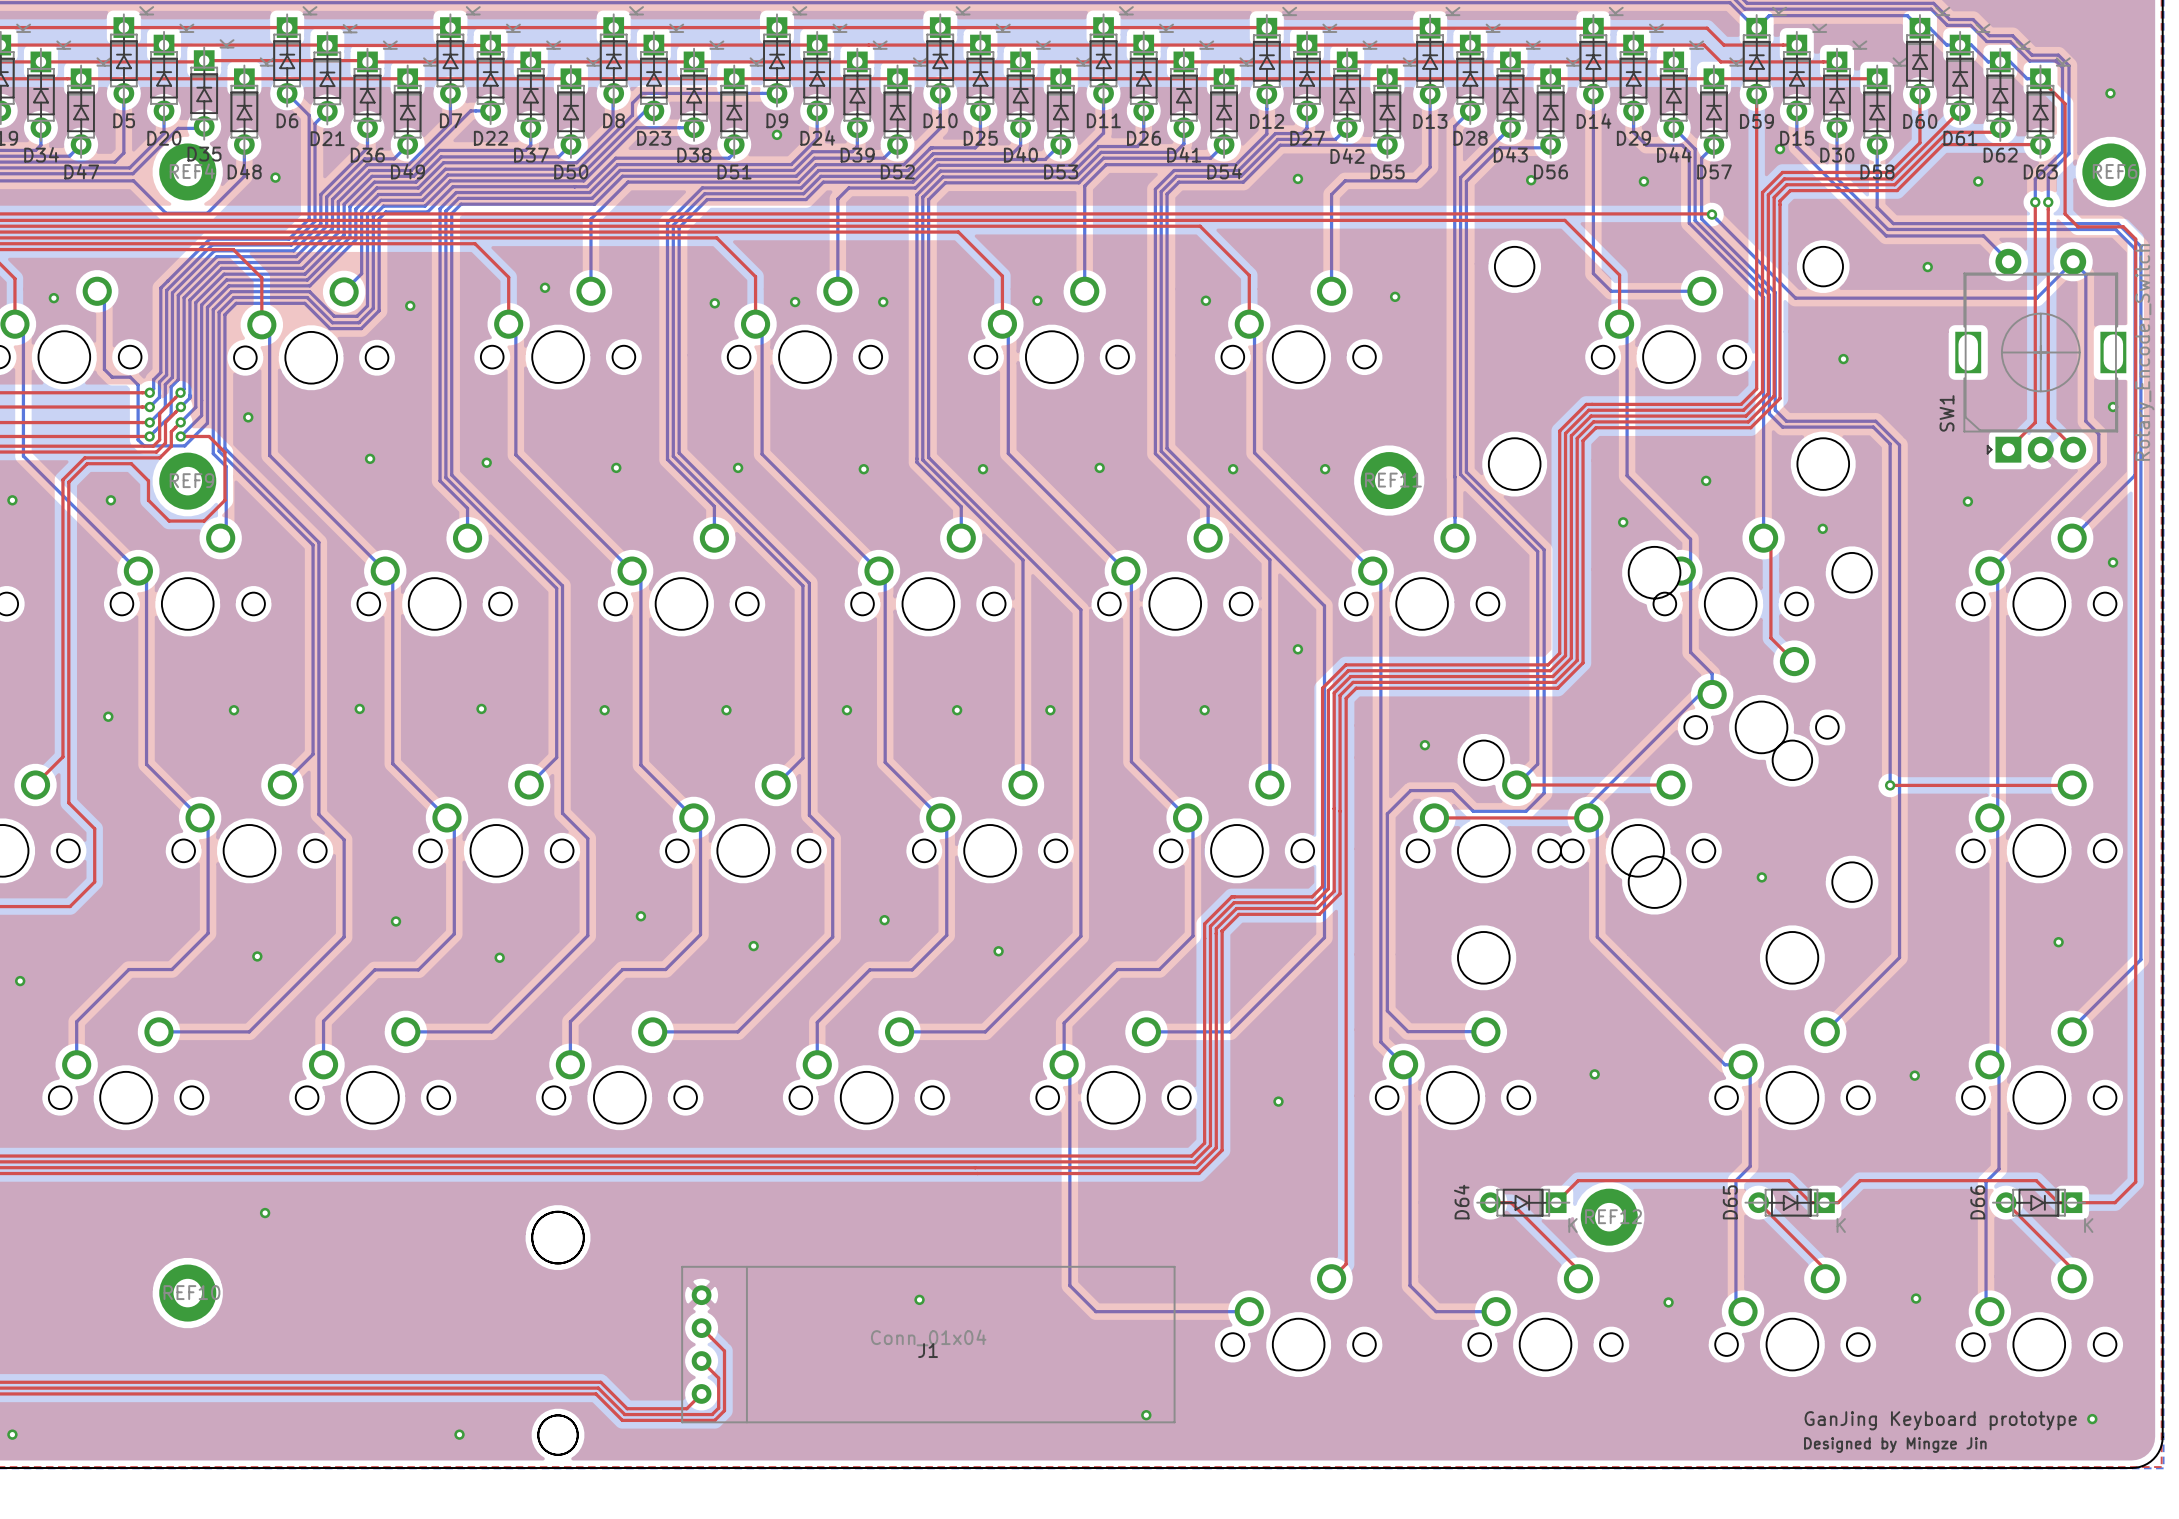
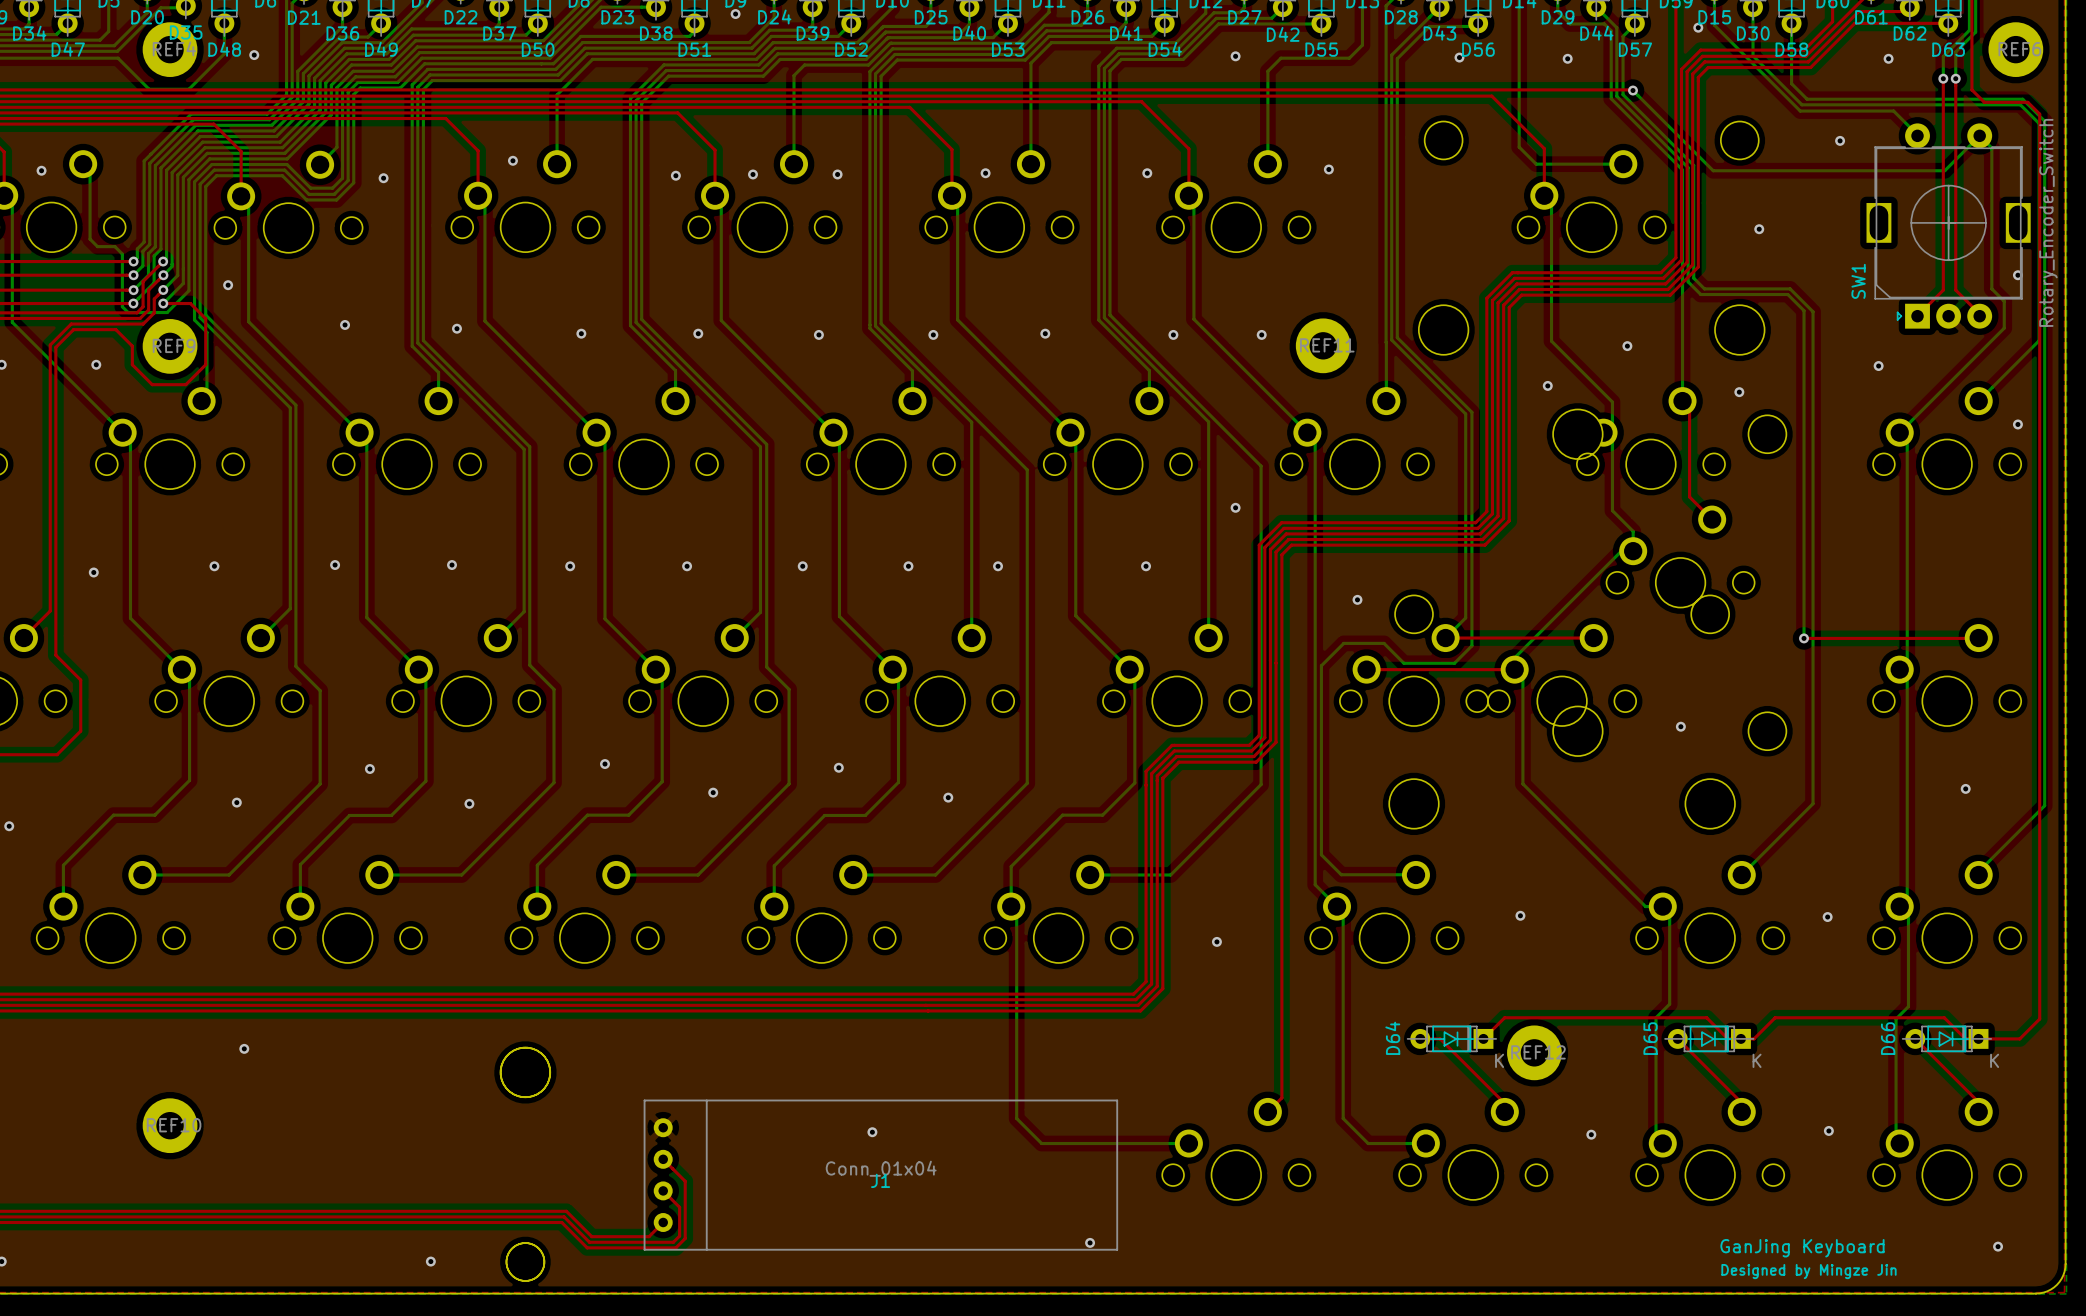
text: GanJing Keyboard prototype (1940, 1420) -> GanJing Keyboard (1802, 1248)

